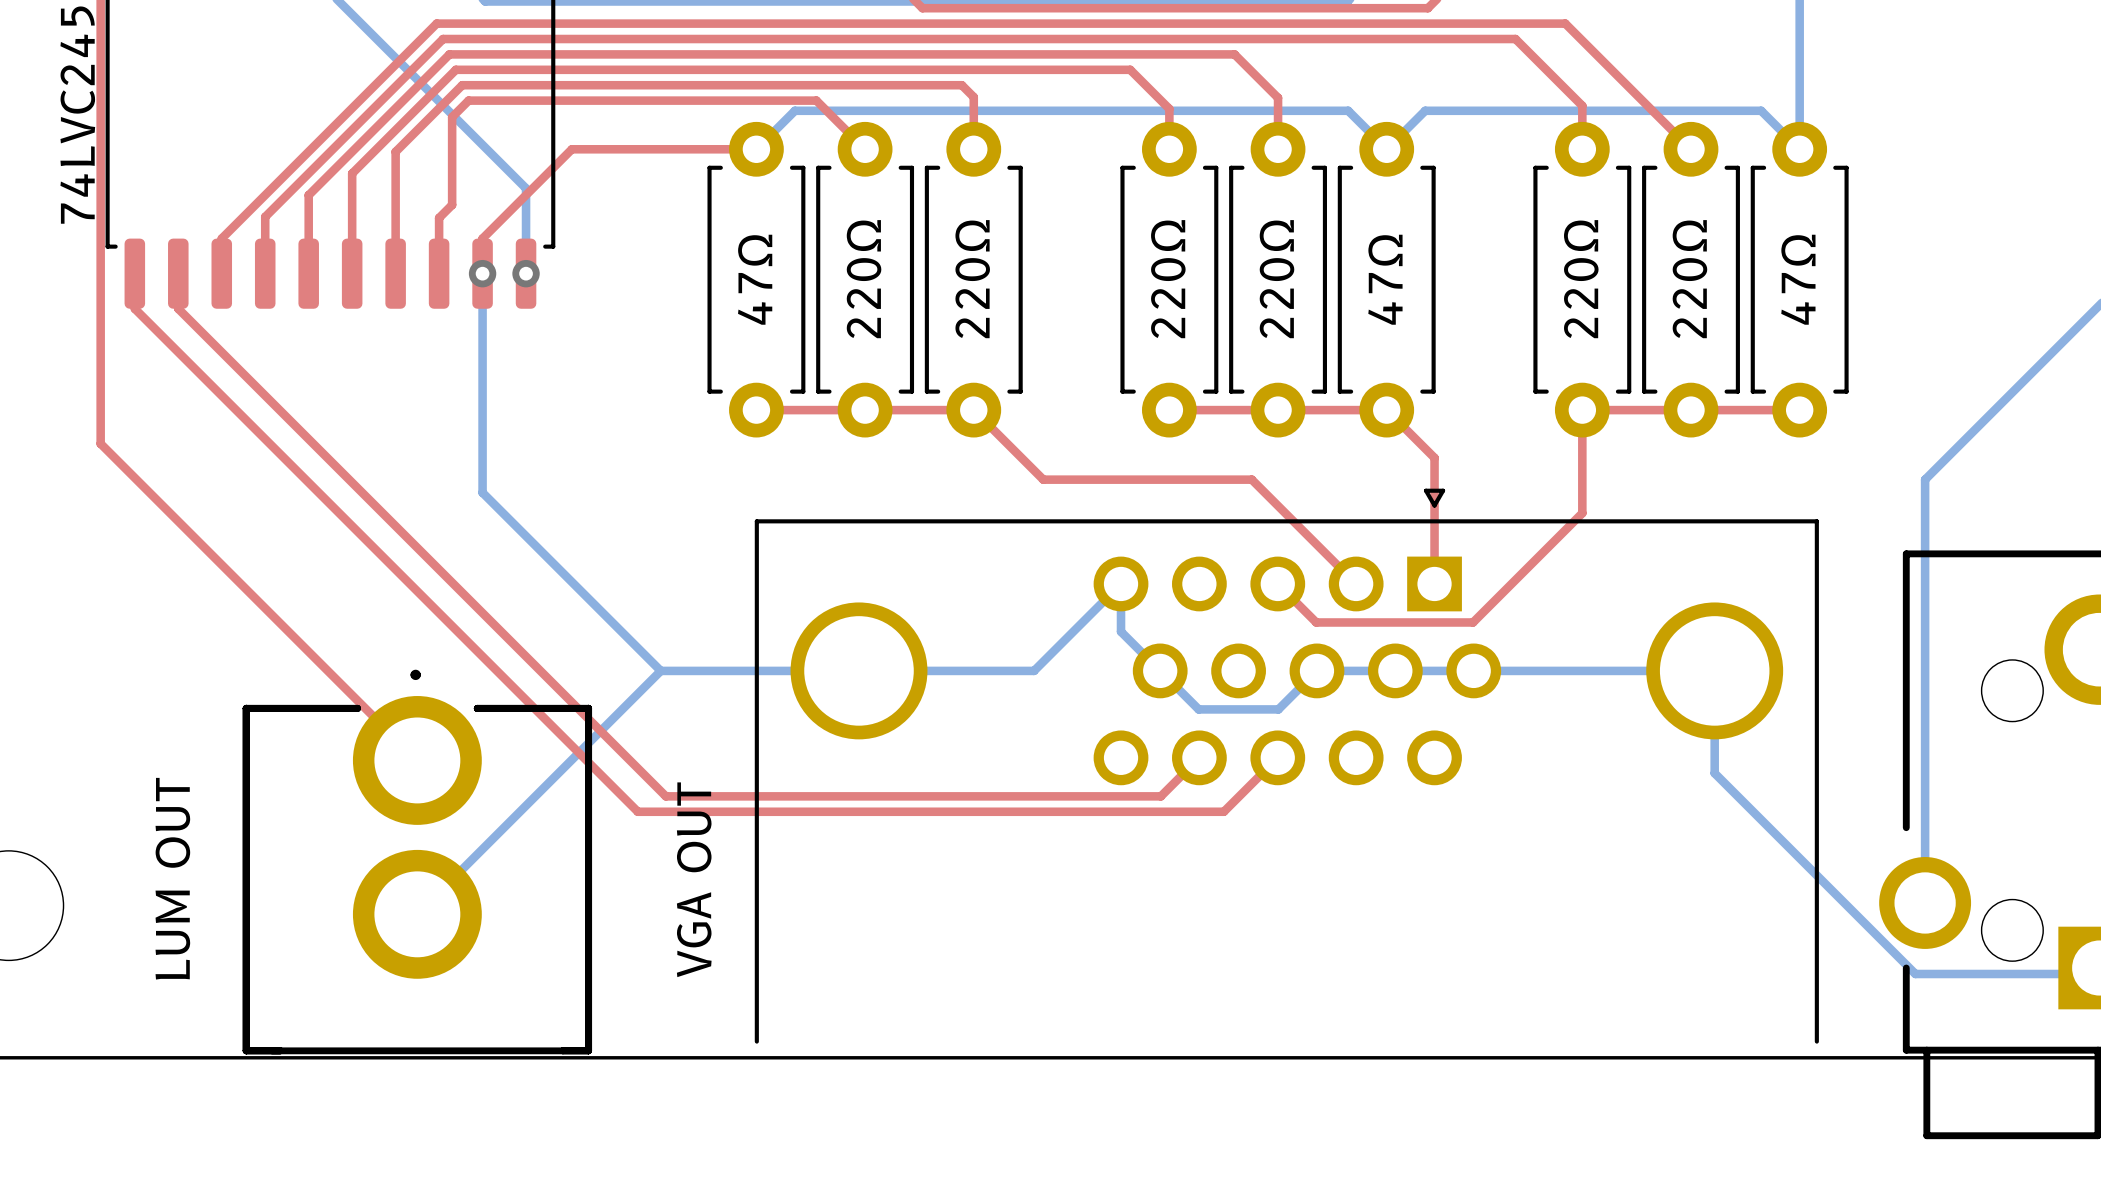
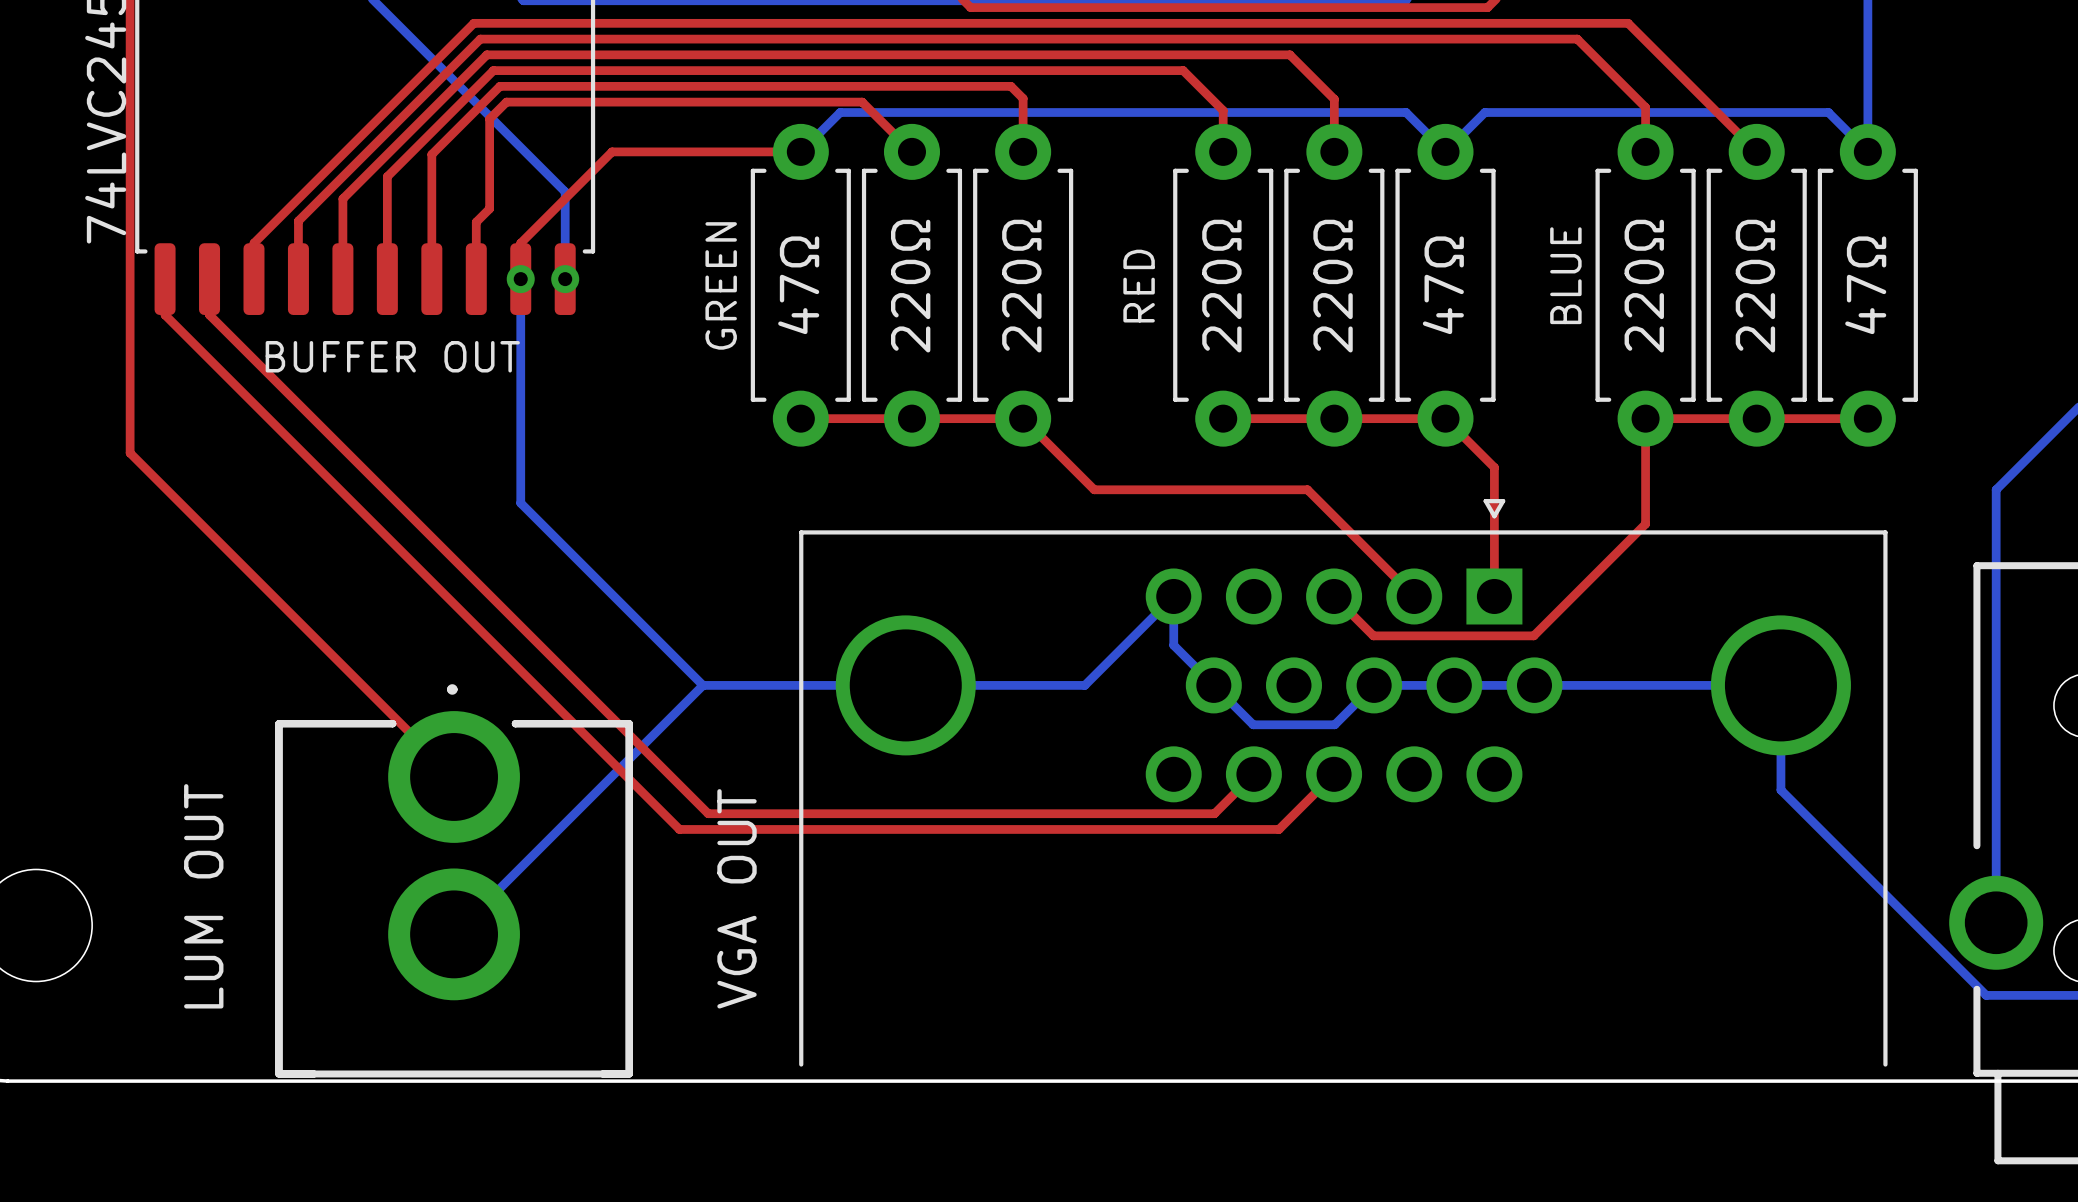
text: none -> BLUE (1565, 275)
text: none -> GREEN (721, 285)
text: none -> RED (1139, 286)
text: none -> BUFFER OUT (392, 356)

